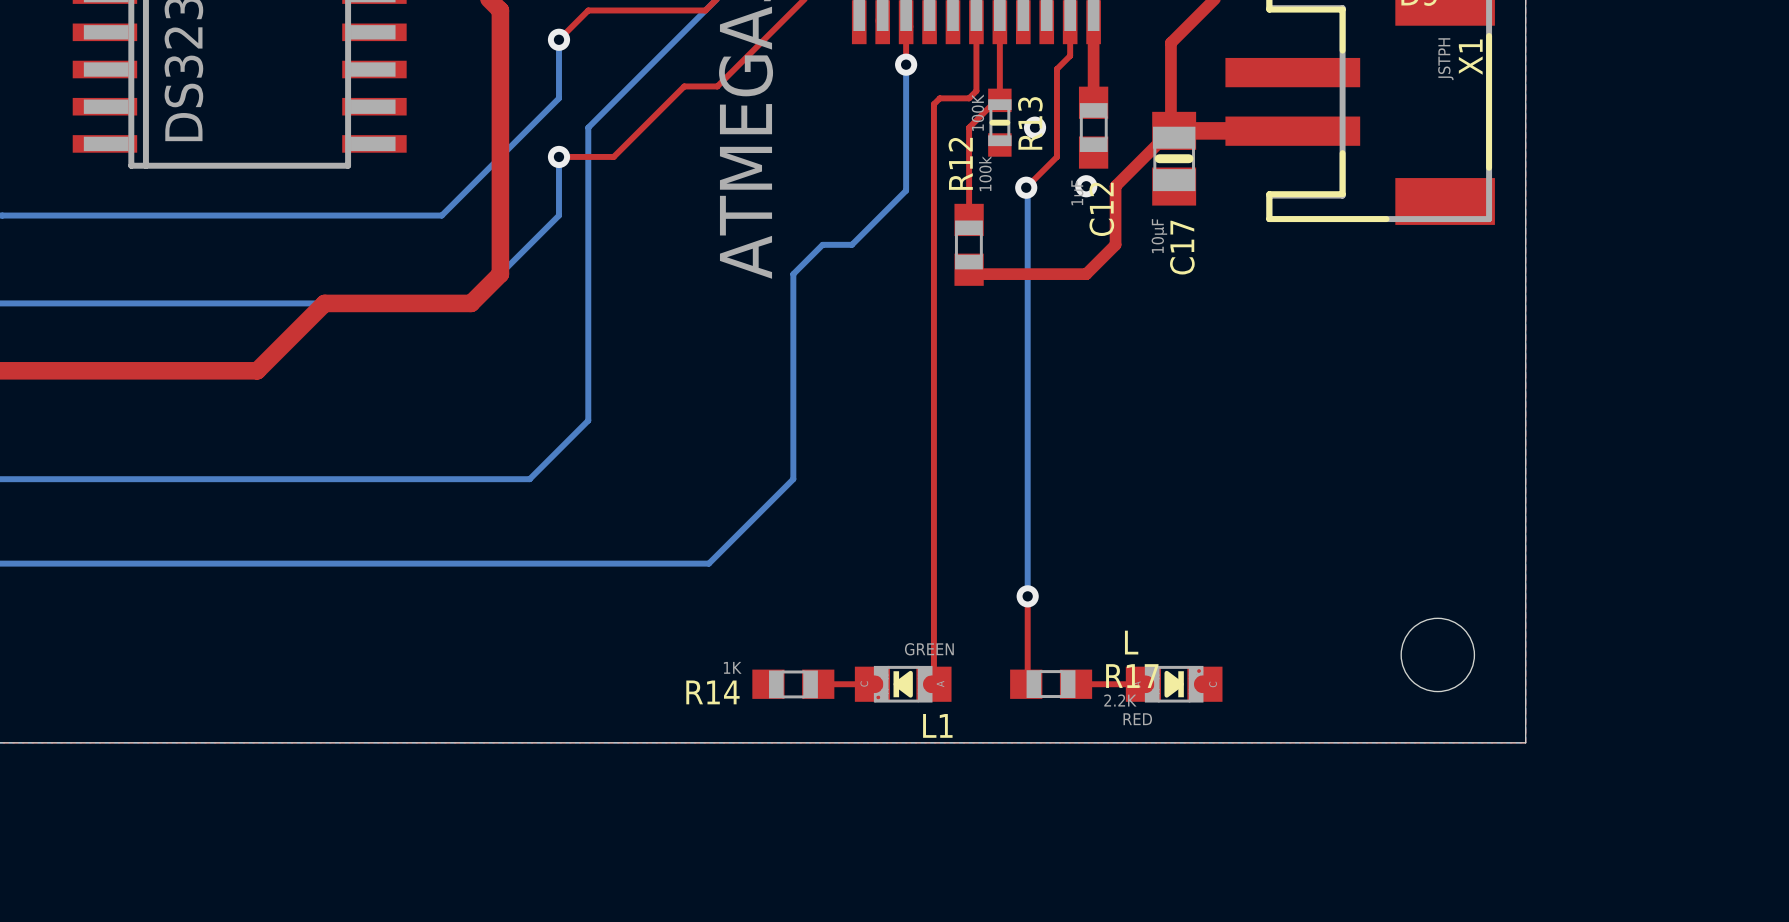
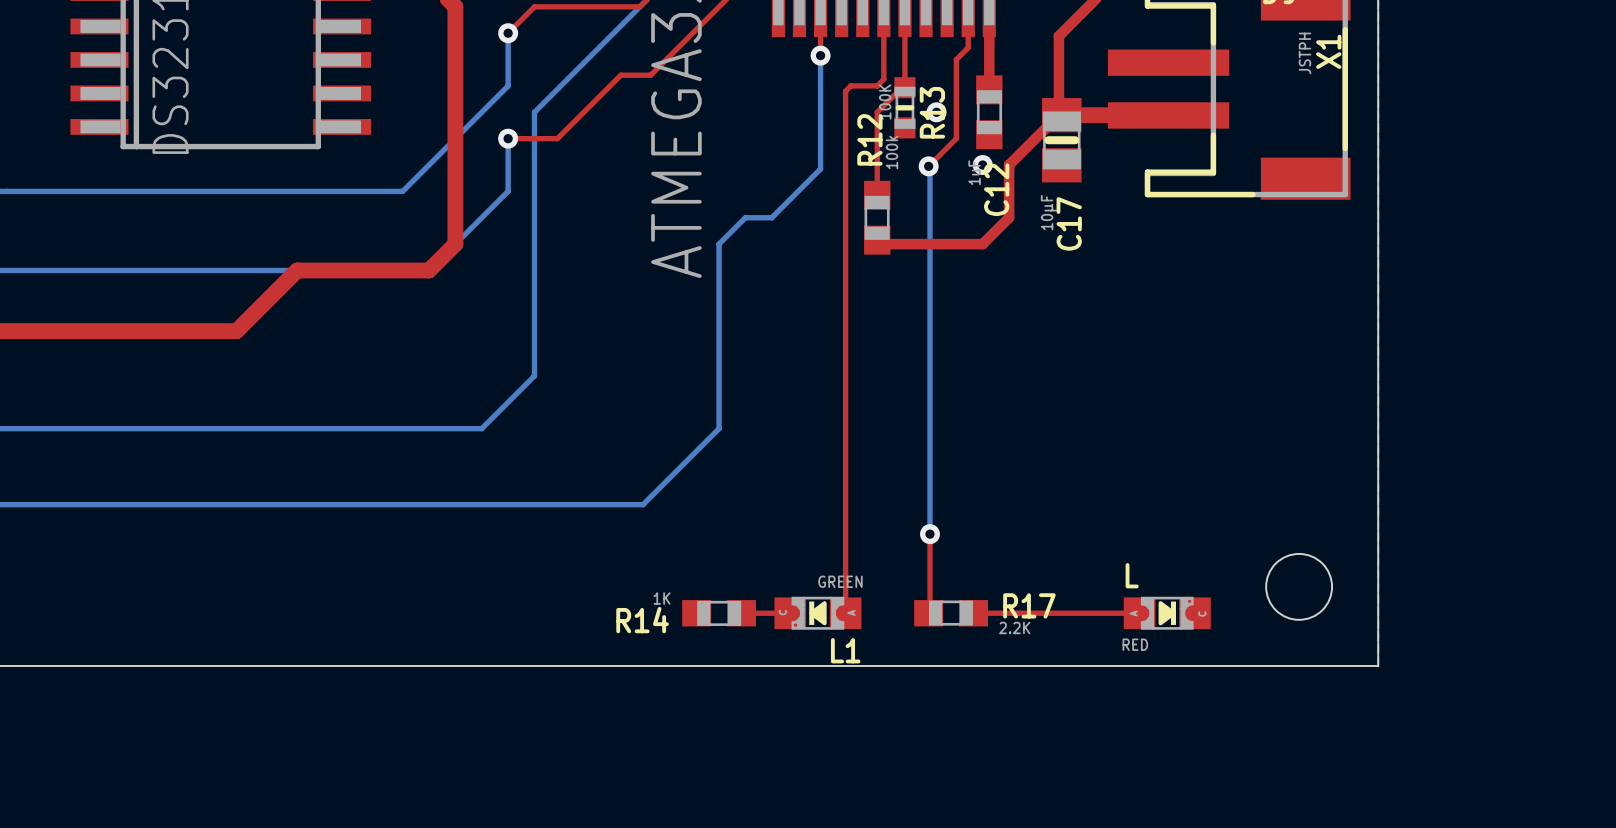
top track: none -> (1034, 613) (1139, 613)
L position: (1174, 684) -> (1167, 613)

